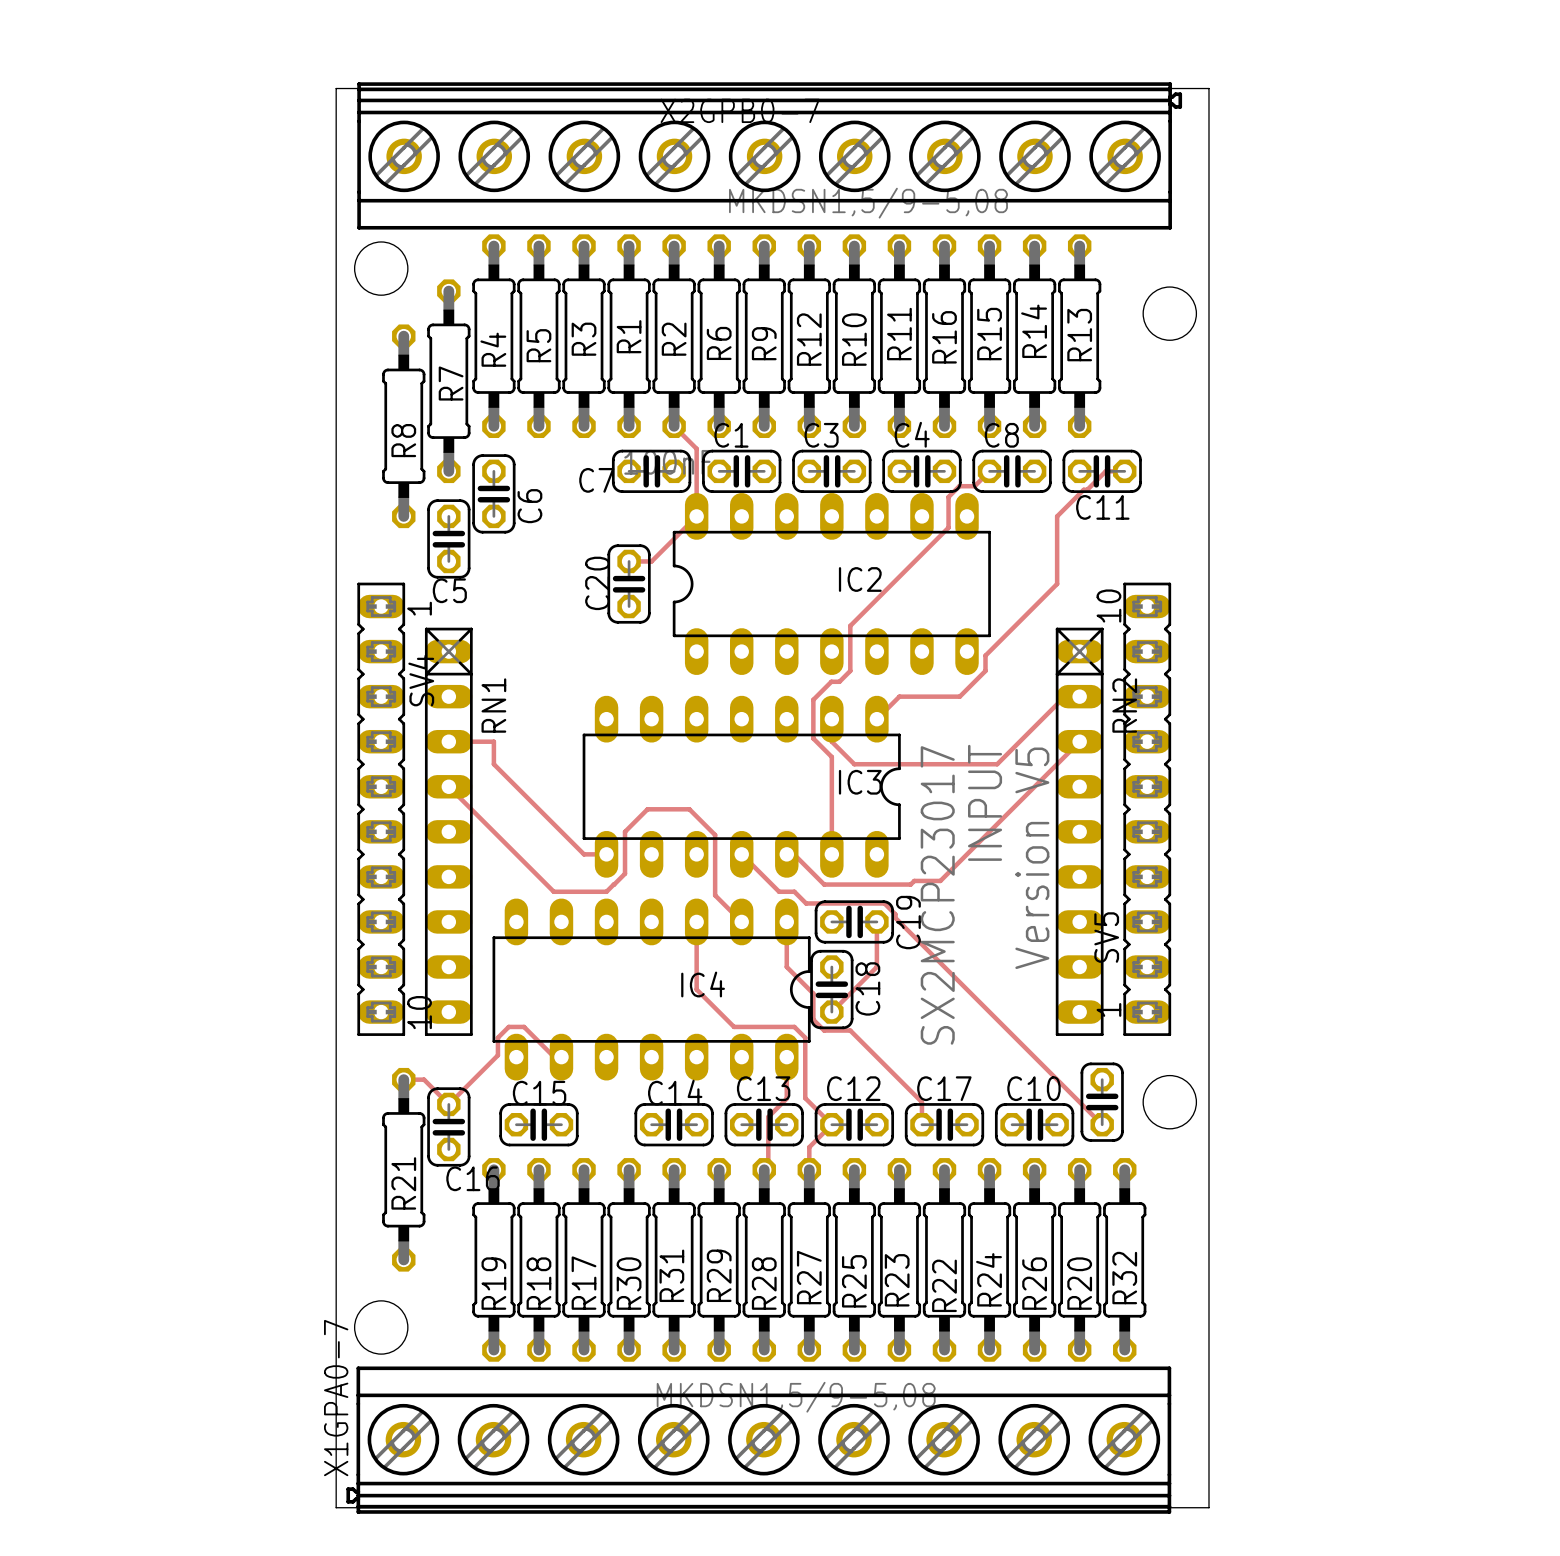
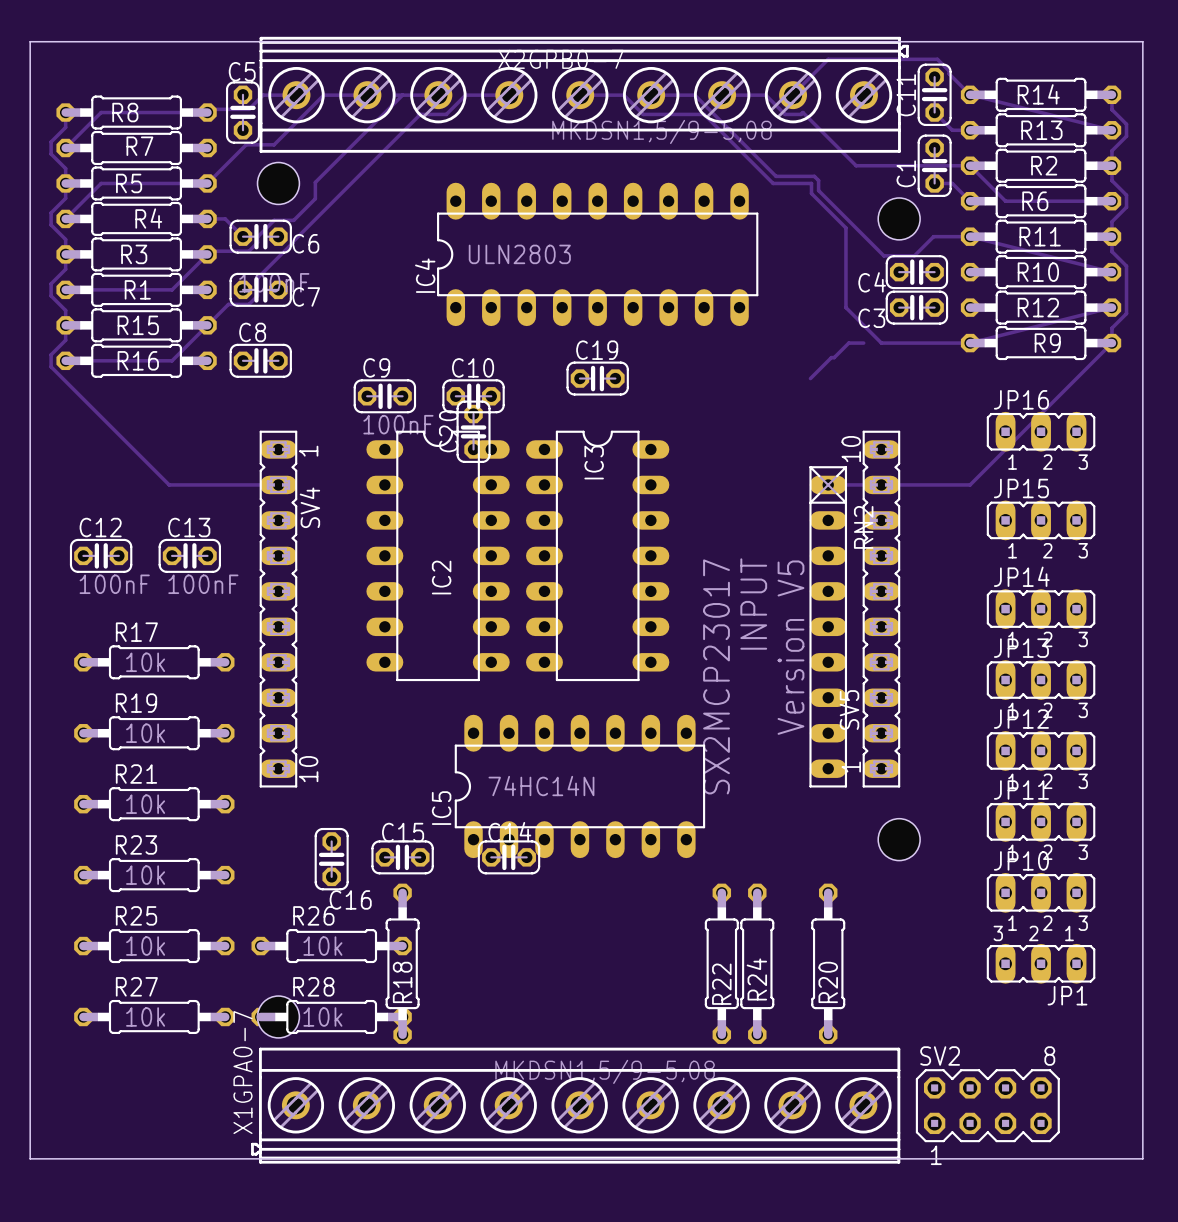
board edge: (336, 88) (336, 1507) -> (242, 41) (30, 41) (30, 1158) (242, 1158)
board edge: (1208, 88) (1208, 1507) -> (930, 41) (1142, 41) (1142, 1158) (930, 1158)
track: none -> (1111, 94) (1111, 109) (1126, 124) (1126, 136) (1111, 150) (1111, 180) (1126, 195) (1126, 207) (1111, 221) (1111, 251) (1126, 266) (1126, 313) (1111, 328) (1111, 343) (970, 484) (828, 484)
track: none -> (296, 95) (263, 95) (249, 109) (210, 109) (207, 112) (101, 112) (65, 148)
track: none -> (367, 95) (323, 95) (274, 144) (246, 144) (207, 183) (101, 183) (65, 218)
track: none -> (394, 95) (438, 95)
track: none -> (402, 95) (315, 182) (315, 198) (293, 220) (274, 220) (257, 237) (257, 242) (249, 251) (210, 251) (172, 289) (65, 289)
track: none -> (509, 95) (465, 95) (446, 114) (418, 114)
track: none -> (580, 95) (623, 95) (643, 114) (704, 114) (773, 183) (811, 183) (811, 193) (845, 227) (845, 307) (881, 343) (970, 343) (1111, 307)
track: none -> (651, 95) (694, 95) (776, 176) (814, 176) (818, 180) (818, 190) (883, 255) (914, 255) (933, 236) (970, 236) (1111, 272)
track: none -> (722, 95) (765, 95) (785, 114) (801, 114) (802, 112) (856, 165) (970, 165) (1005, 201) (1111, 201)
track: none -> (793, 95) (828, 59) (937, 59) (970, 94) (1111, 130)
track: none -> (65, 112) (65, 127) (51, 141) (51, 154) (65, 168) (65, 198) (51, 212) (51, 224) (65, 239) (65, 269) (51, 283) (51, 295) (65, 310) (65, 340) (51, 354) (51, 366) (169, 484) (278, 484)
track: none -> (934, 112) (952, 130) (970, 130)
track: none -> (420, 114) (257, 278) (257, 295) (249, 304) (228, 304) (172, 360) (65, 360)
track: none -> (934, 183) (952, 183) (970, 201)
track: none -> (207, 218) (225, 218) (242, 236)
R4 rotation: 0° (493, 336) -> 90° clockwise (136, 218)
R4 position: (493, 336) -> (136, 218)
R5 rotation: 0° (538, 336) -> 90° clockwise (136, 183)
R5 position: (538, 336) -> (136, 183)
R3 rotation: 0° (584, 336) -> 90° clockwise (136, 254)
R3 position: (584, 336) -> (136, 254)
R1 rotation: 0° (629, 336) -> 90° clockwise (136, 289)
R1 position: (629, 336) -> (136, 289)
R2 rotation: 0° (674, 336) -> 90° clockwise (1041, 165)
R2 position: (674, 336) -> (1041, 165)
R6 rotation: 0° (719, 336) -> 90° clockwise (1041, 201)
R6 position: (719, 336) -> (1041, 201)
R9 rotation: 0° (764, 336) -> 90° clockwise (1041, 343)
R9 position: (764, 336) -> (1041, 343)
R12 rotation: 0° (809, 336) -> 90° clockwise (1041, 307)
R12 position: (809, 336) -> (1041, 307)
R10 rotation: 0° (854, 336) -> 90° clockwise (1041, 272)
R10 position: (854, 336) -> (1041, 272)
R11 rotation: 0° (899, 336) -> 90° clockwise (1041, 236)
R11 position: (899, 336) -> (1041, 236)
R16 rotation: 0° (944, 336) -> 90° clockwise (136, 360)
R16 position: (944, 336) -> (136, 360)
R15 rotation: 0° (989, 336) -> 90° clockwise (136, 325)
R15 position: (989, 336) -> (136, 325)
R14 rotation: 0° (1034, 336) -> 90° clockwise (1041, 94)
R14 position: (1034, 336) -> (1041, 94)
R13 rotation: 0° (1079, 336) -> 90° clockwise (1041, 130)
R13 position: (1079, 336) -> (1041, 130)
IC4 value: none -> ULN2803 (519, 254)
R7 rotation: 0° (448, 381) -> 90° clockwise (136, 148)
R7 position: (448, 381) -> (136, 148)
R8 rotation: 0° (403, 426) -> 90° clockwise (136, 112)
R8 position: (403, 426) -> (136, 112)
track: (674, 426) (696, 448) (696, 516) (651, 561) (629, 561) -> none
C4 name position: C4 (912, 434) -> C4 (872, 282)
C3 name position: C3 (821, 435) -> C3 (871, 318)
C7 position: (651, 471) -> (260, 289)
C1 rotation: 0° (741, 471) -> 90° counterclockwise (934, 165)
C1 position: (741, 471) -> (934, 165)
C3 rotation: 0° (831, 471) -> 180° (916, 307)
C3 position: (831, 471) -> (916, 307)
C4 rotation: 0° (921, 471) -> 180° (916, 272)
C4 position: (921, 471) -> (916, 272)
track: (989, 471) (974, 486) (959, 486) (948, 497) (948, 527) (850, 625) (850, 670) (839, 681) (831, 681) (813, 699) (813, 738) (831, 757) (831, 854) -> none
C8 position: (1012, 471) -> (260, 360)
C11 rotation: 0° (1102, 471) -> 90° clockwise (934, 94)
C11 position: (1102, 471) -> (934, 94)
C7 name position: C7 (596, 480) -> C7 (306, 296)
C6 rotation: 0° (493, 493) -> 90° counterclockwise (260, 236)
C6 position: (493, 493) -> (260, 236)
track: (1057, 516) (1057, 584) (985, 655) (985, 670) (959, 696) (899, 696) (876, 719) -> none
C5 rotation: 0° (448, 538) -> 180° (242, 112)
C5 position: (448, 538) -> (242, 112)
C9: none -> 100nF (384, 396)
IC2 rotation: 0° (831, 584) -> 90° clockwise (438, 555)
IC2 position: (831, 584) -> (438, 555)
JP16: none -> (1041, 431)
track: (1079, 696) (1064, 696) (997, 764) (854, 764) (831, 741) (831, 719) -> none
JP15: none -> (1041, 520)
track: (448, 741) (493, 741) (493, 764) (584, 854) (606, 854) -> none
track: (1079, 741) (940, 880) (914, 880) (910, 884) (824, 884) (793, 854) (786, 854) -> none
C12 value: none -> 100nF (114, 584)
C13 value: none -> 100nF (203, 584)
track: (448, 786) (553, 891) (606, 891) (625, 873) (625, 831) (647, 809) (689, 809) (715, 834) (715, 895) (741, 921) -> none
IC3 rotation: 0° (741, 786) -> 90° counterclockwise (597, 555)
JP14: none -> (1041, 609)
RN1: (448, 831) -> none
track: (741, 854) (779, 891) (794, 891) (806, 903) (884, 903) (895, 914) (895, 917) (1102, 1124) -> none
R17 value: none -> 10k (145, 662)
IC4 footprint: [492, 898, 811, 1081] -> [437, 182, 759, 327]
JP13: none -> (1041, 680)
track: (696, 921) (696, 989) (734, 1026) (794, 1026) (805, 1037) (805, 1098) (831, 1124) (809, 1147) (809, 1169) -> none
track: (786, 921) (786, 967) (813, 993) (813, 1019) (824, 1030) (850, 1030) (921, 1102) (921, 1124) -> none
C19 rotation: 0° (854, 921) -> 180° (597, 378)
C19 position: (854, 921) -> (597, 378)
track: (876, 921) (876, 967) (831, 1012) -> none
C19 name position: C19 (908, 922) -> C19 (597, 350)
R19 value: none -> 10k (145, 733)
IC4 name position: IC4 (703, 984) -> IC4 (425, 275)
C18: (831, 989) -> none
JP12: none -> (1041, 750)
IC5: none -> 74HC14N (579, 786)
R21 value: none -> 10k (145, 804)
track: (561, 1057) (554, 1057) (524, 1026) (508, 1026) (497, 1037) (497, 1055) (448, 1104) (424, 1079) (403, 1079) -> none
track: (786, 1057) (786, 1098) (768, 1117) (768, 1165) (764, 1169) -> none
JP11: none -> (1041, 821)
part: (1102, 1102) -> none
C13 position: (764, 1124) -> (189, 555)
C12 position: (854, 1124) -> (101, 555)
C17: (944, 1124) -> none
C10 position: (1034, 1124) -> (473, 396)
R23 value: none -> 10k (145, 875)
R21 rotation: 0° (403, 1169) -> 90° clockwise (154, 804)
R21 position: (403, 1169) -> (154, 804)
JP10: none -> (1041, 892)
R21 name position: R21 (403, 1183) -> R21 (136, 774)
R25 value: none -> 10k (145, 946)
R26 value: none -> 10k (322, 946)
R19 rotation: 0° (493, 1259) -> 90° clockwise (154, 733)
R19 position: (493, 1259) -> (154, 733)
R17 rotation: 0° (584, 1259) -> 90° clockwise (154, 662)
R17 position: (584, 1259) -> (154, 662)
R30: (629, 1259) -> none
R31: (674, 1259) -> none
R29: (719, 1259) -> none
R28 rotation: 0° (764, 1259) -> 90° clockwise (331, 1016)
R28 position: (764, 1259) -> (331, 1016)
R27 rotation: 0° (809, 1259) -> 90° clockwise (154, 1016)
R27 position: (809, 1259) -> (154, 1016)
R25 rotation: 0° (854, 1259) -> 90° clockwise (154, 946)
R25 position: (854, 1259) -> (154, 946)
R23 rotation: 0° (899, 1259) -> 90° clockwise (154, 875)
R23 position: (899, 1259) -> (154, 875)
R26 rotation: 0° (1034, 1259) -> 90° clockwise (331, 946)
R26 position: (1034, 1259) -> (331, 946)
R32: (1124, 1259) -> none
JP1: none -> (1041, 963)
R27 name position: R27 (809, 1277) -> R27 (136, 986)
R23 name position: R23 (897, 1280) -> R23 (136, 844)
R25 name position: R25 (854, 1281) -> R25 (136, 915)
R19 name position: R19 (493, 1283) -> R19 (136, 703)
R17 name position: R17 (584, 1283) -> R17 (136, 632)
R28 name position: R28 (764, 1283) -> R28 (313, 986)
R26 name position: R26 (1034, 1283) -> R26 (313, 915)
R27 value: none -> 10k (145, 1016)
R28 value: none -> 10k (322, 1016)
SV2: none -> (987, 1105)

